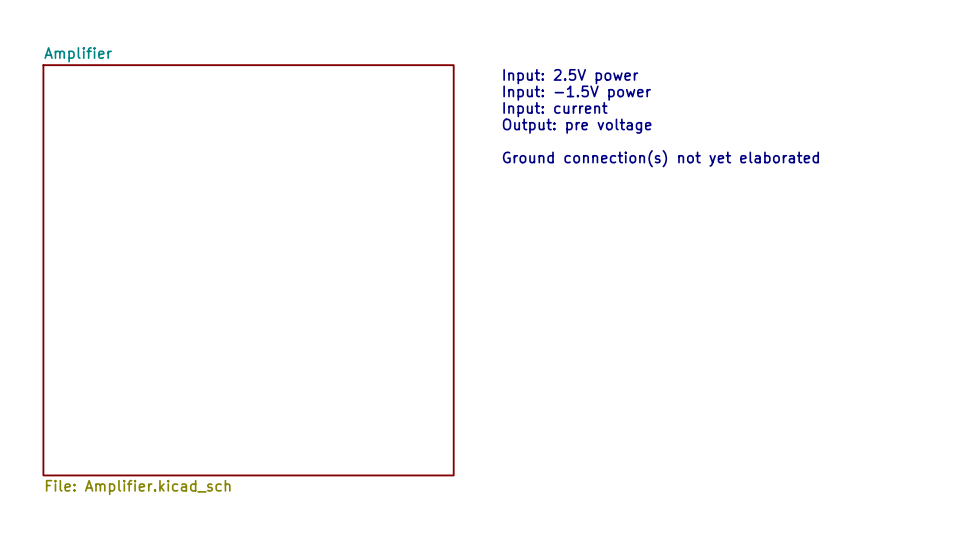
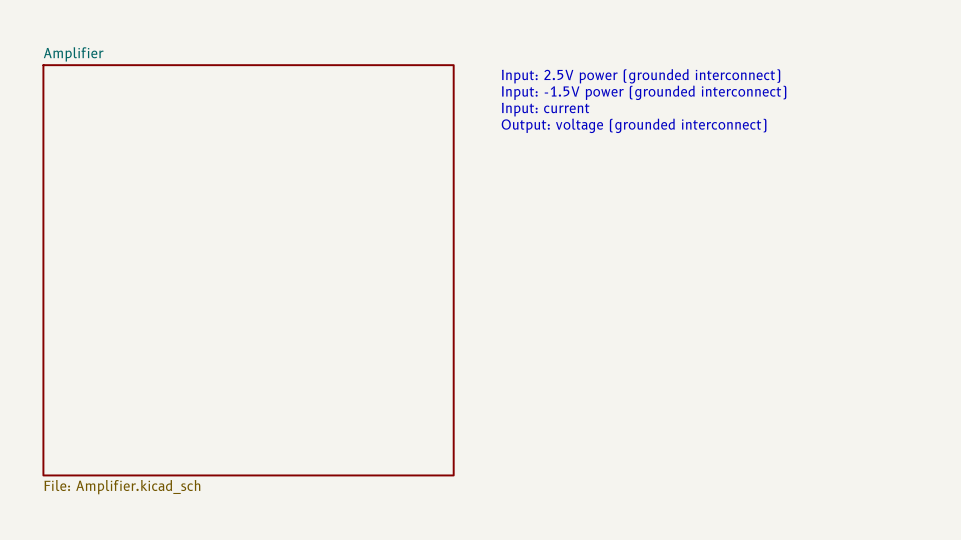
text: Input: 2.5V power (570, 76) -> Input: 2.5V power (grounded interconnect) (641, 76)
text: Input: -1.5V power (577, 93) -> Input: -1.5V power (grounded interconnect) (644, 92)
text: Output: pre voltage (577, 126) -> Output: voltage (grounded interconnect) (634, 125)
text: Ground connection(s) not yet elaborated (660, 158) -> none

